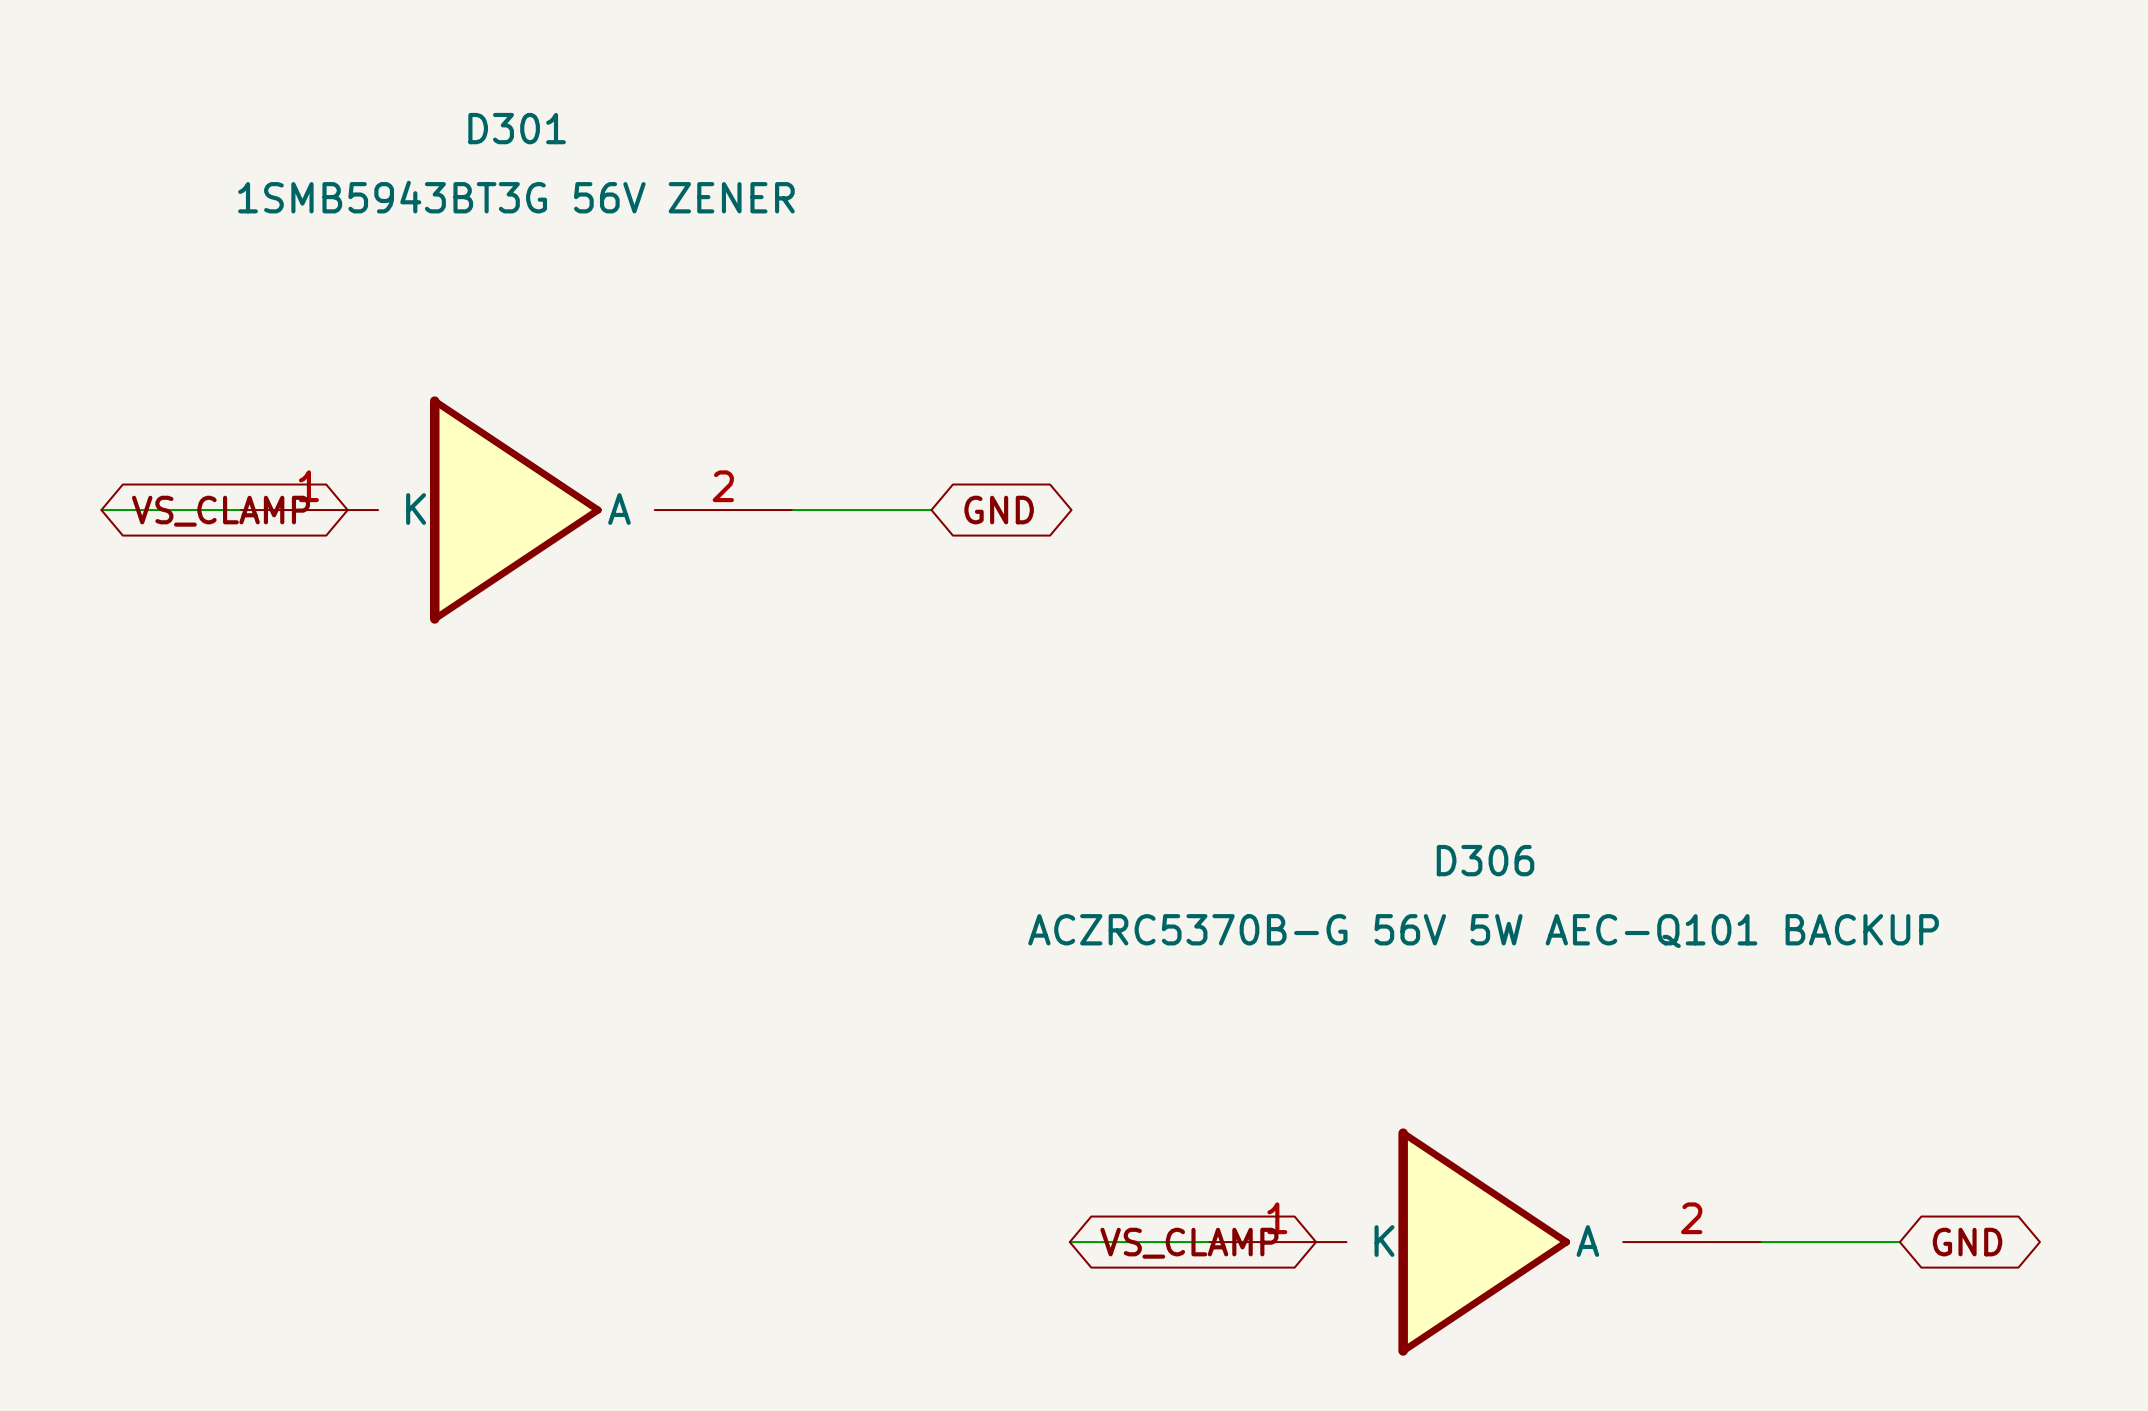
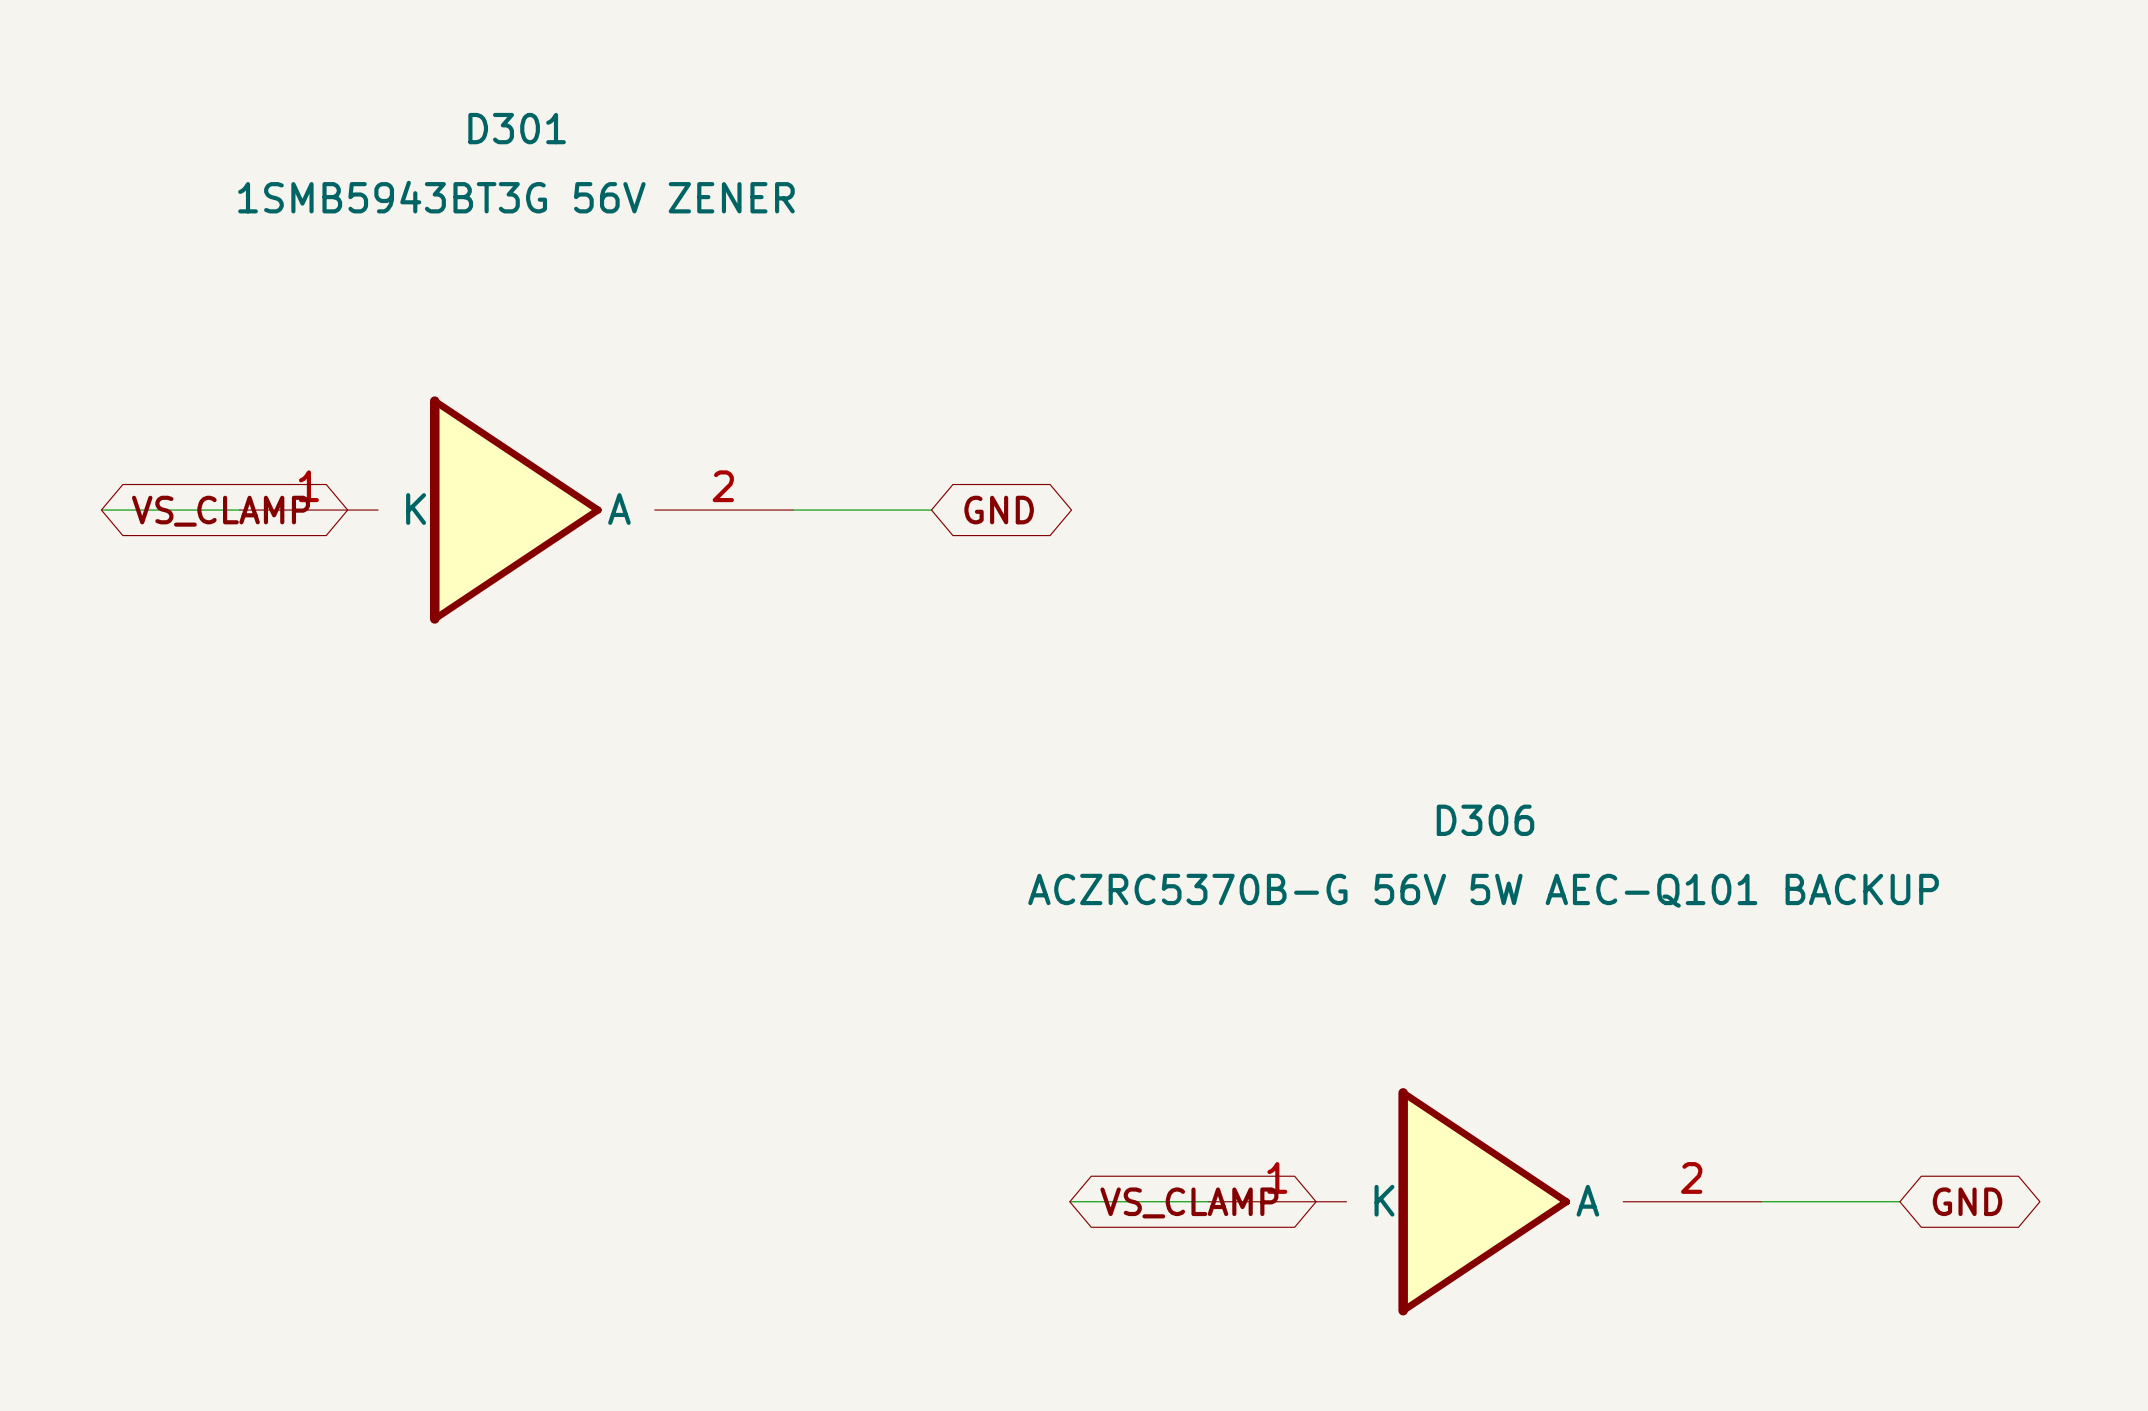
wire: (1069, 1242) (1208, 1242) -> (1069, 1201) (1208, 1201)
D306 position: (1484, 1242) -> (1484, 1201)
wire: (1761, 1242) (1899, 1242) -> (1761, 1201) (1899, 1201)
global label position: GND (1967, 1242) -> GND (1967, 1201)
global label position: VS_CLAMP (1189, 1243) -> VS_CLAMP (1189, 1202)

